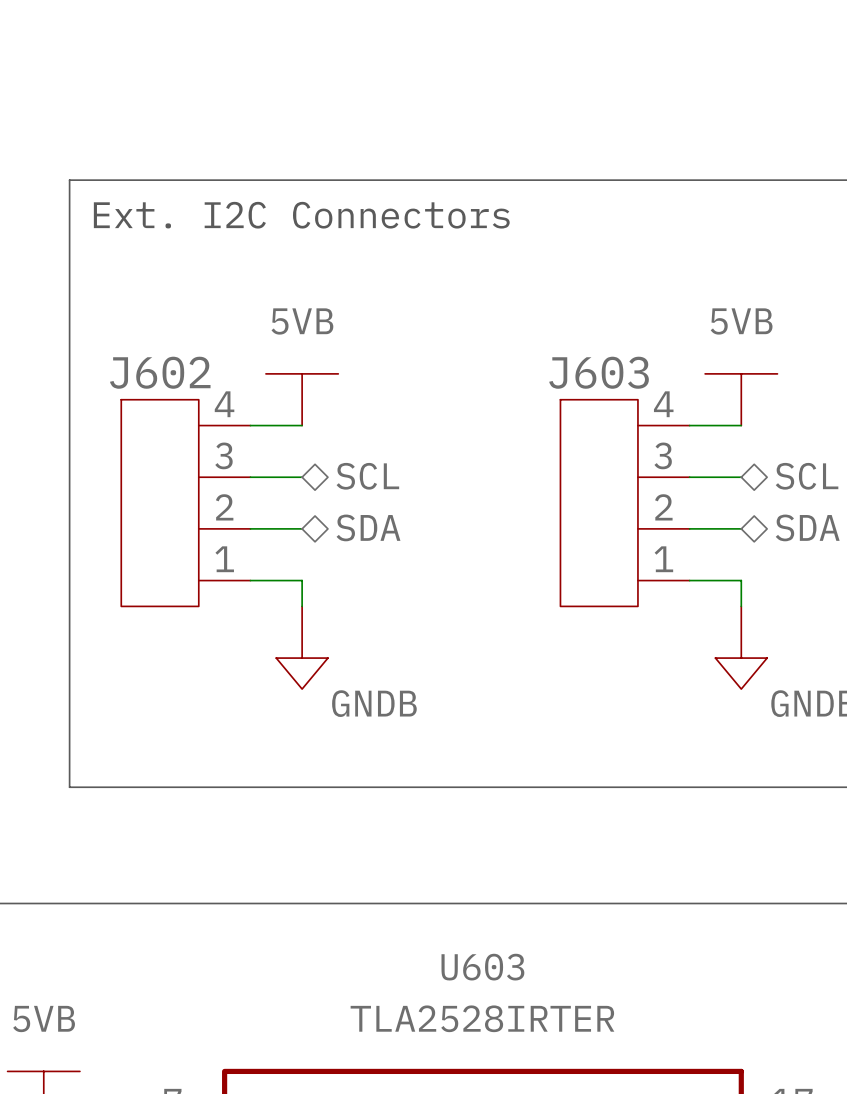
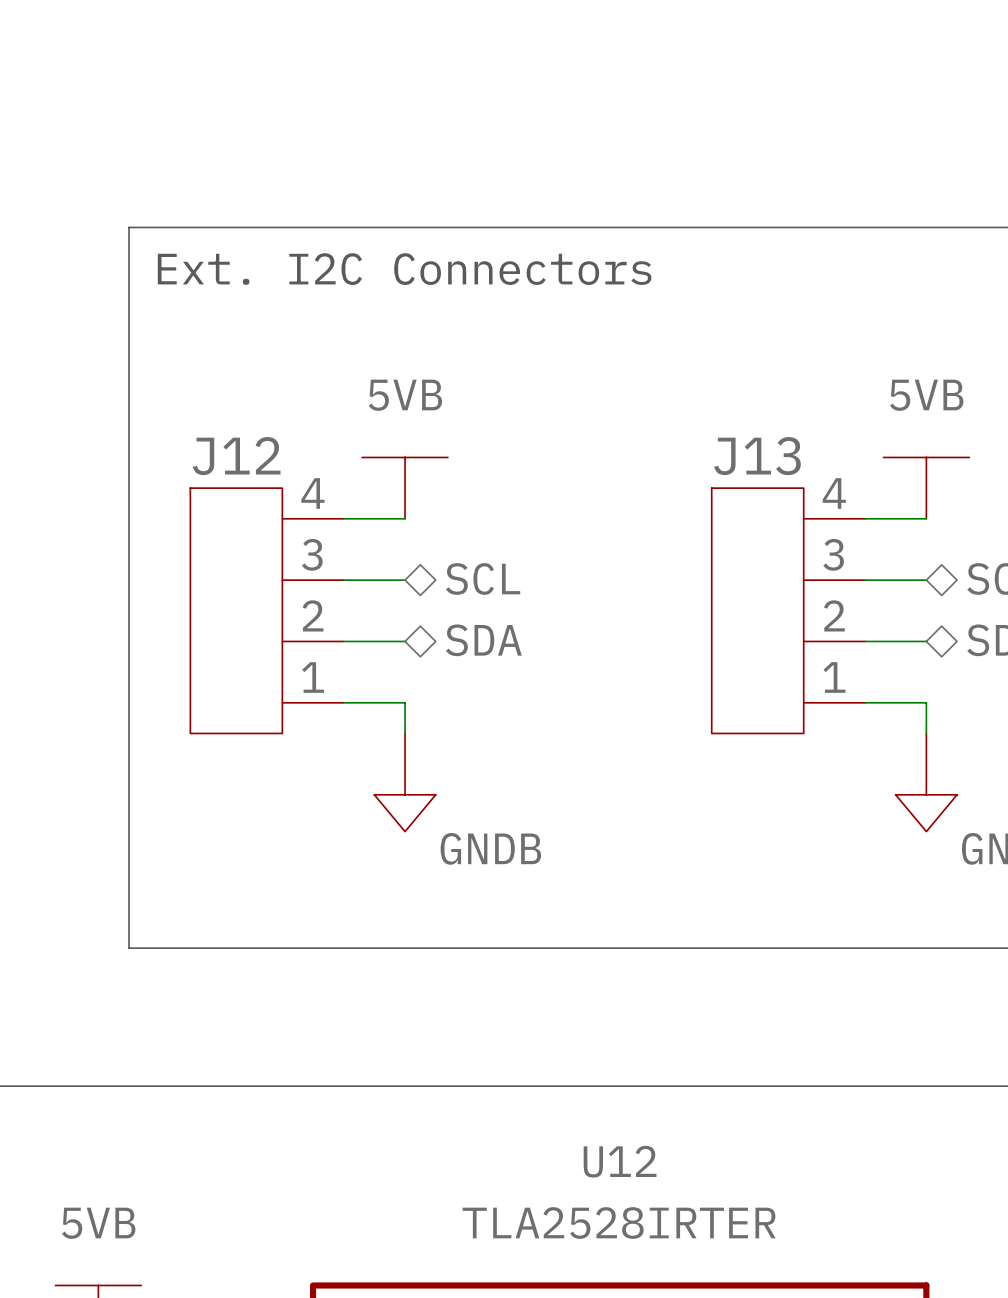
J602 name: J602 (160, 372) -> J12 (236, 456)
J603 name: J603 (599, 372) -> J13 (757, 456)
U603 name: U603 (482, 967) -> U12 (620, 1161)

